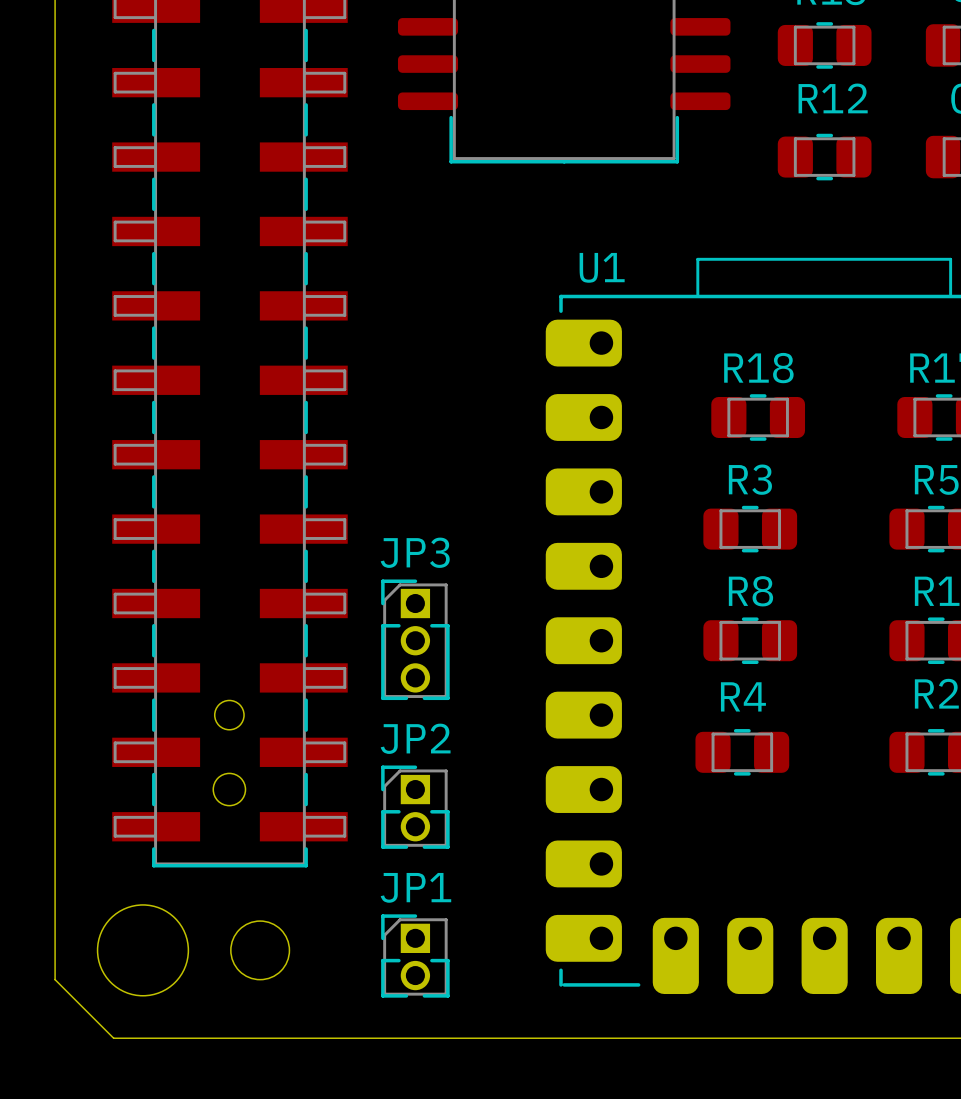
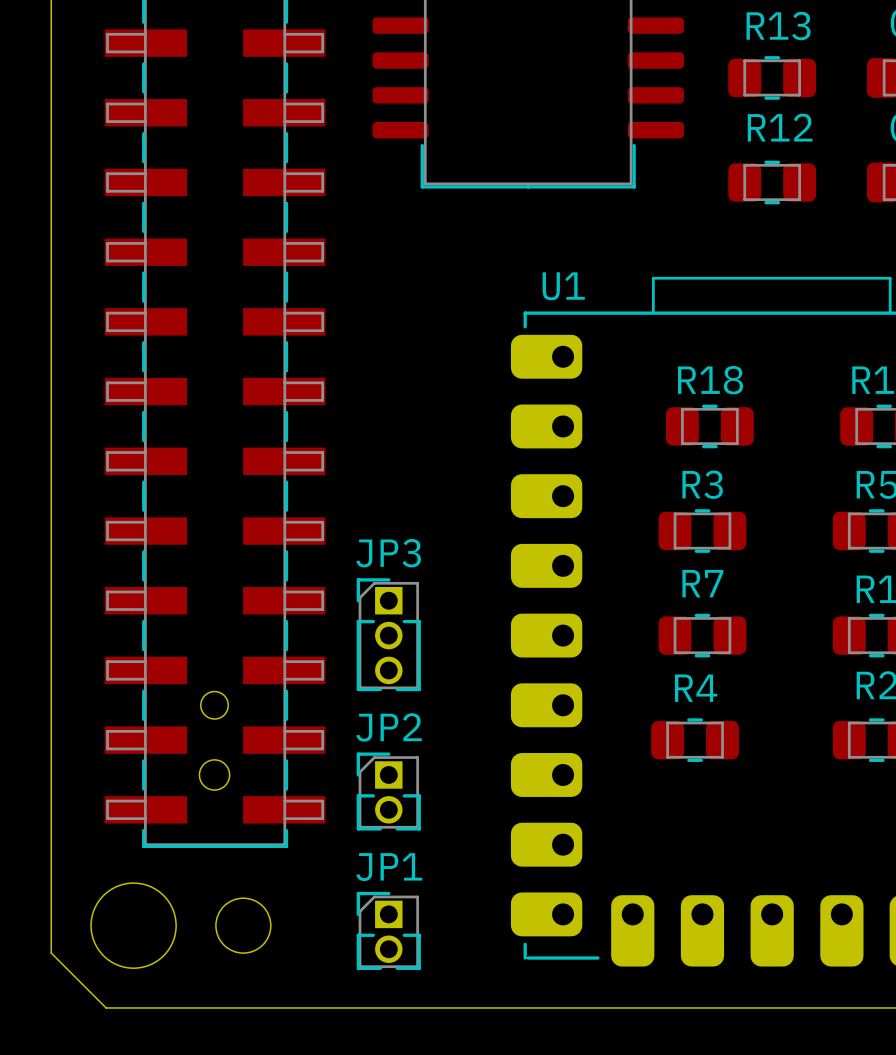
R8 name: R8 (750, 591) -> R7 (702, 583)

